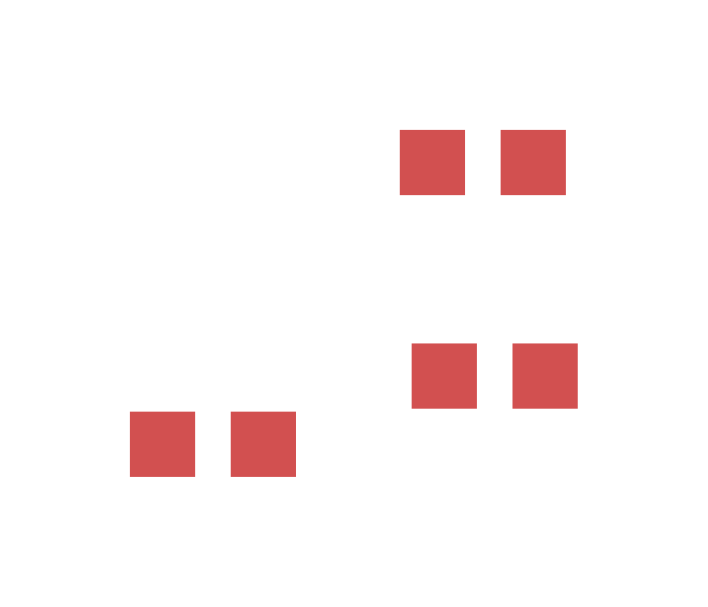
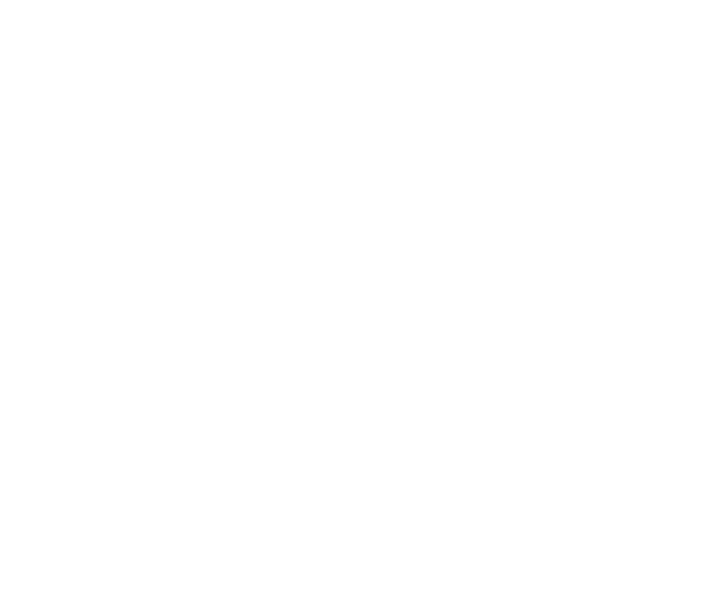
part: (482, 162) -> none
part: (494, 376) -> none
part: (212, 444) -> none

